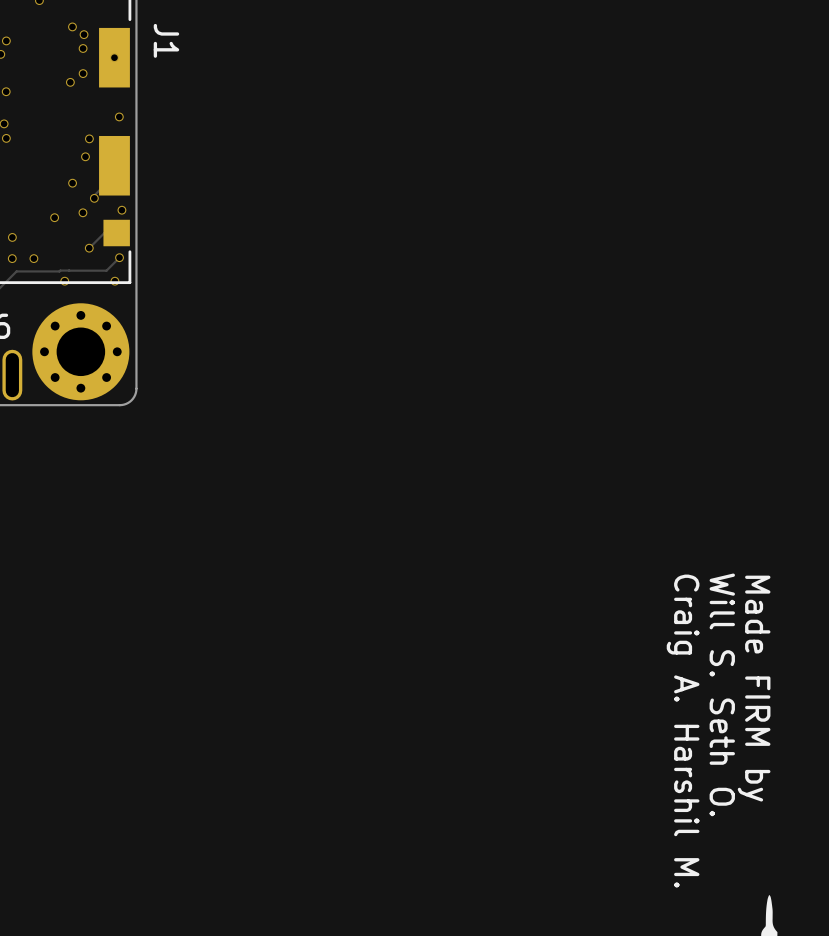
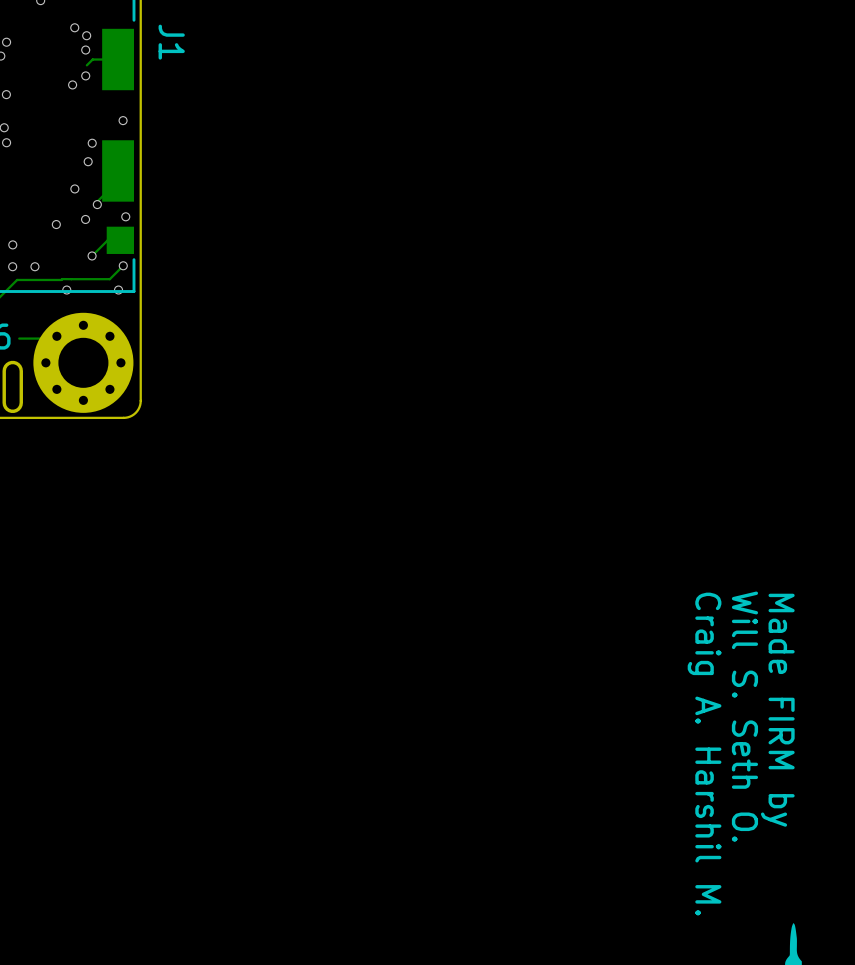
track: none -> (118, 59) (92, 59) (86, 65)
via: (114, 57) -> none
track: none -> (59, 338) (19, 338)

